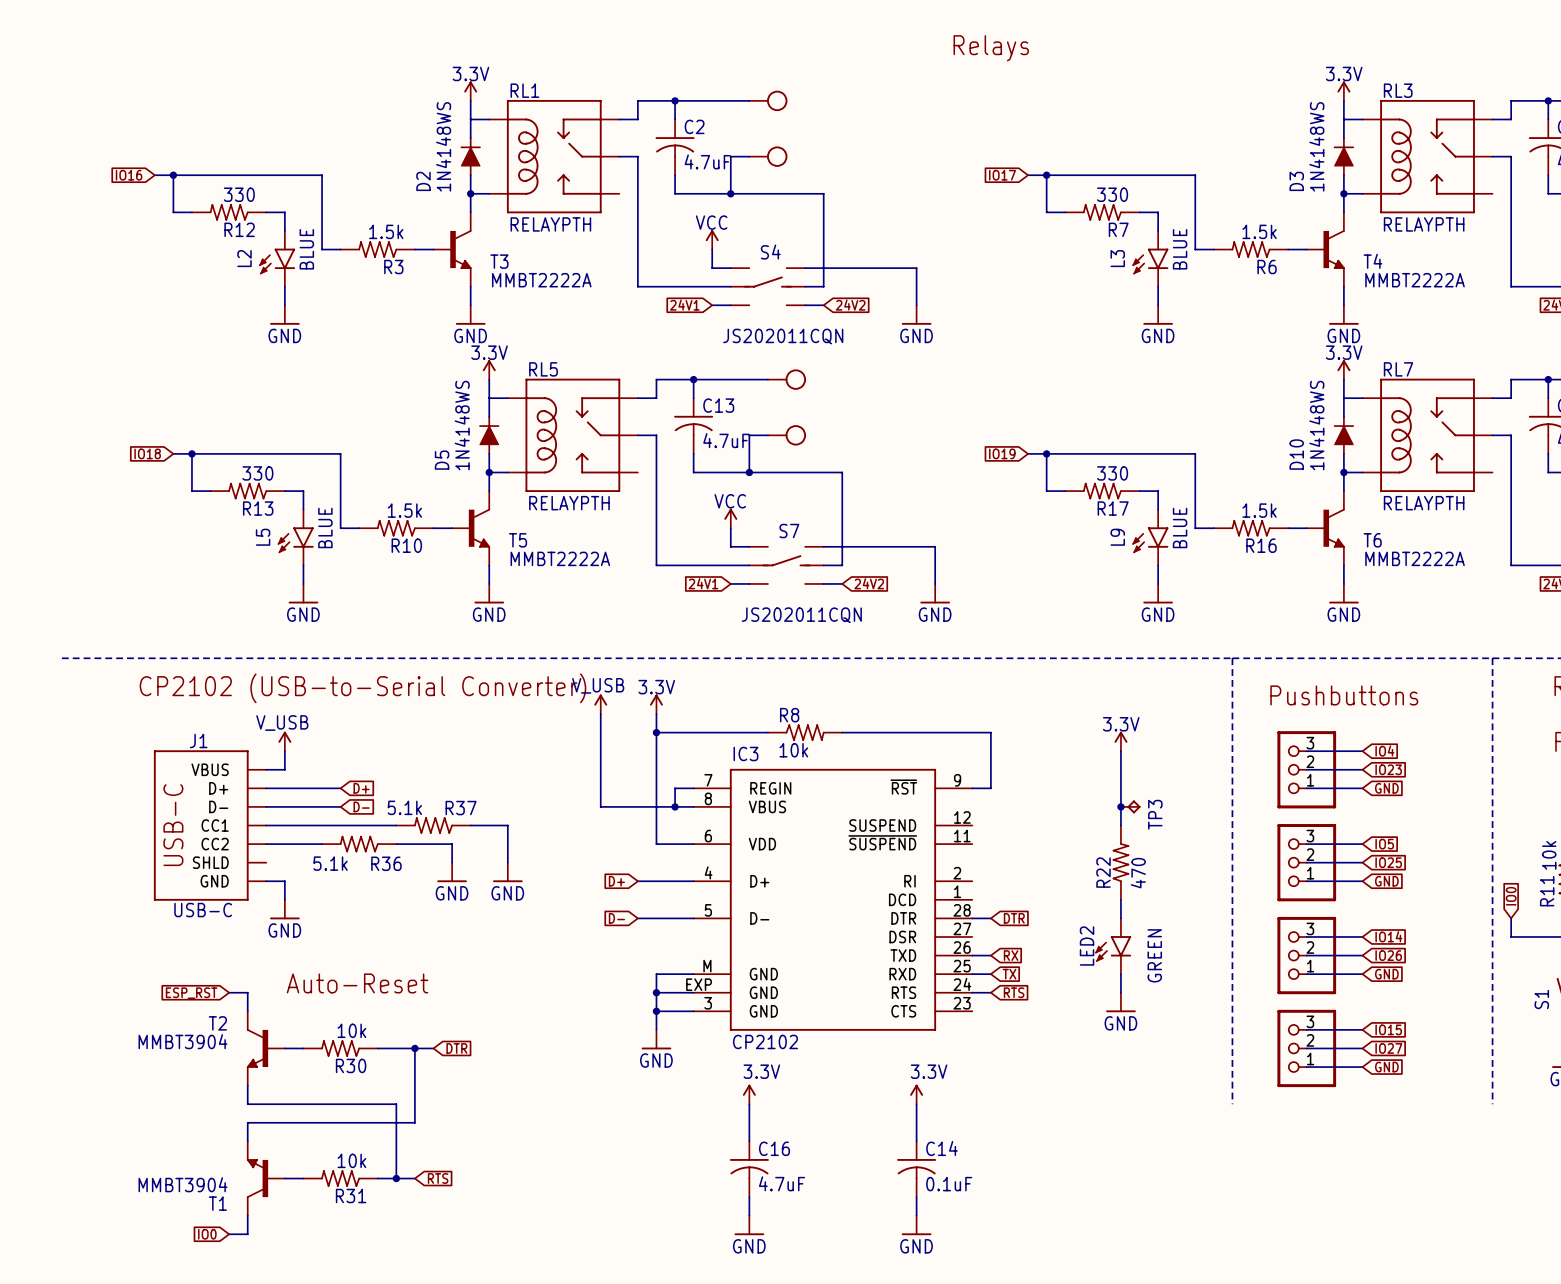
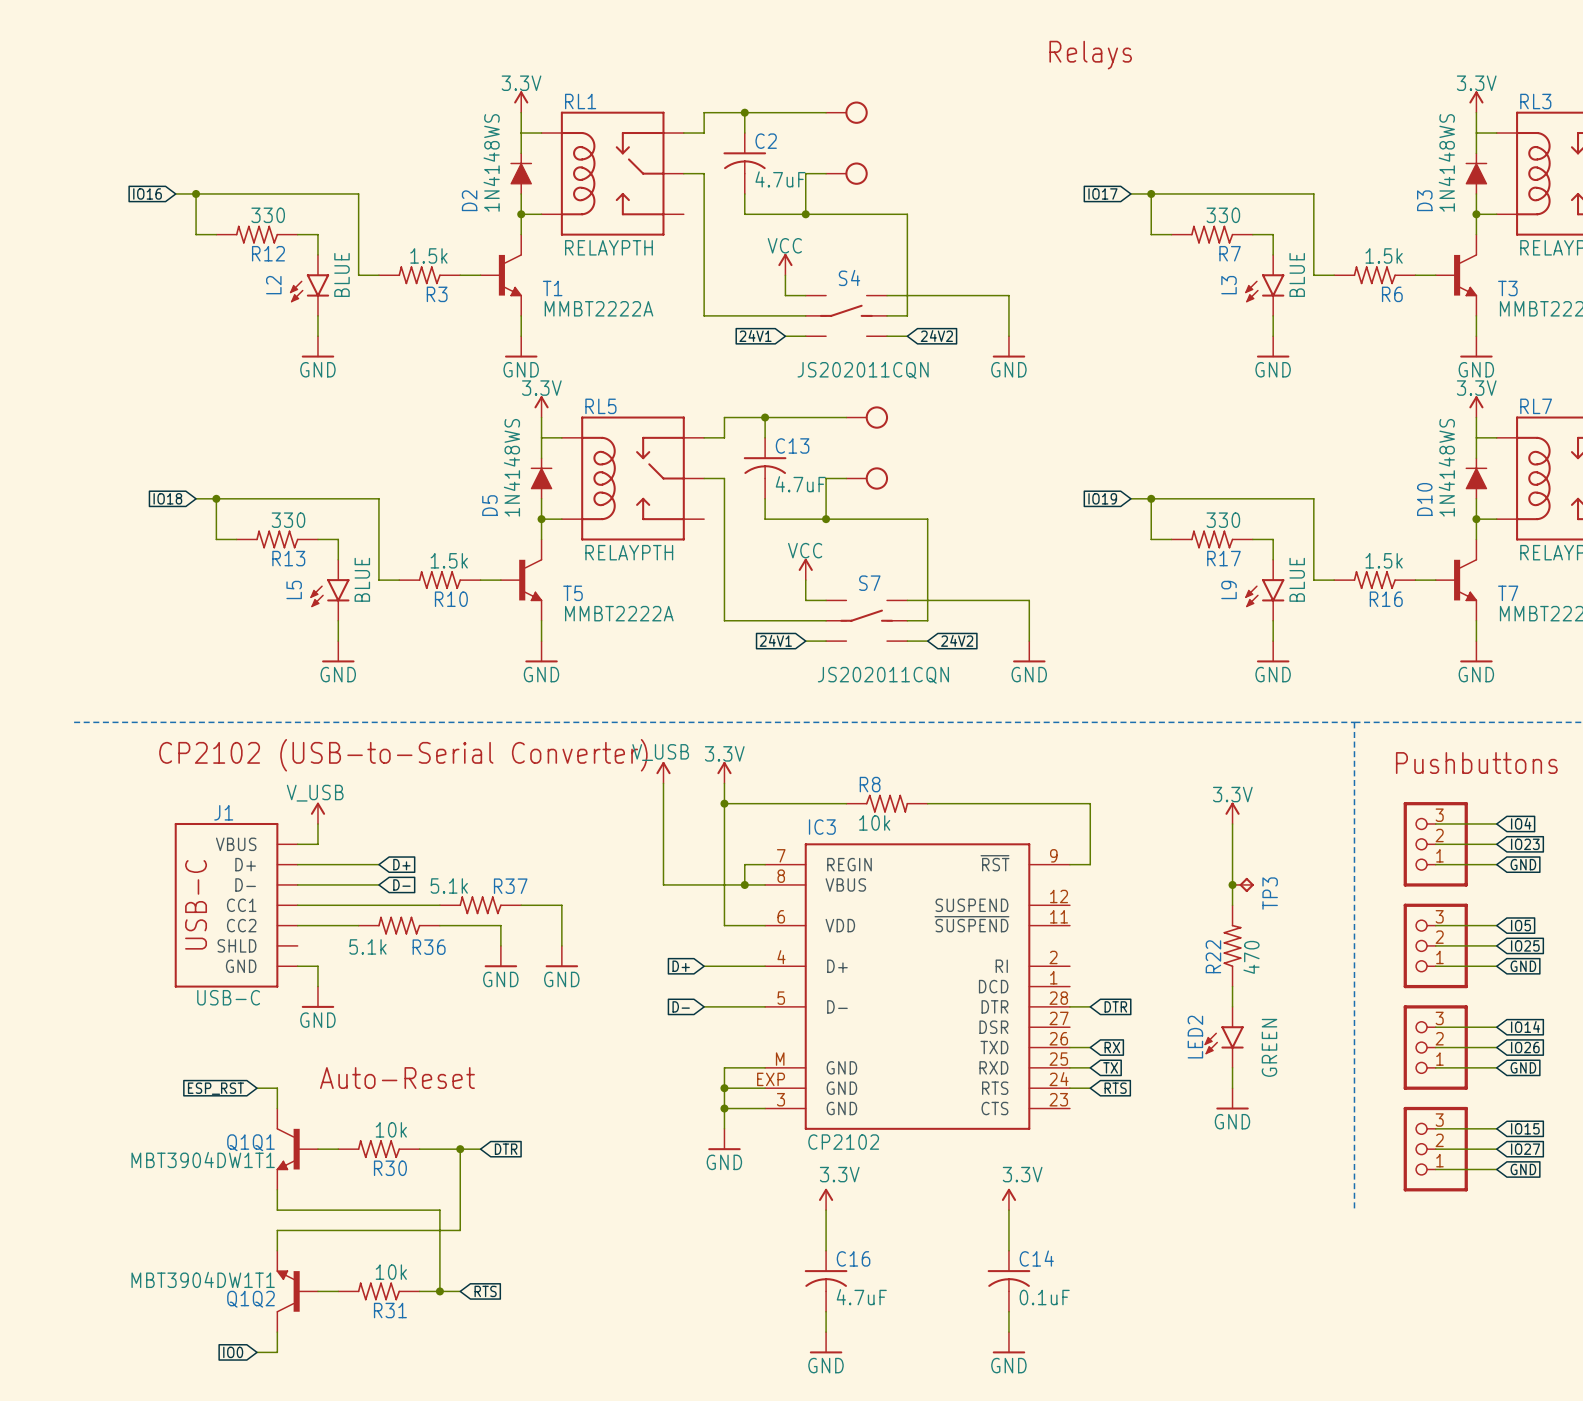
T3 name: T3 (499, 261) -> T1 (552, 288)
T4 name: T4 (1372, 261) -> T3 (1507, 288)
T6 name: T6 (1372, 540) -> T7 (1508, 593)
T2 name: T2 (217, 1023) -> Q1Q1 (250, 1142)
T2 value: MMBT3904 (183, 1041) -> MBT3904DW1T1 (203, 1160)
T1 value: MMBT3904 (183, 1184) -> MBT3904DW1T1 (203, 1279)
T1 name: T1 (217, 1203) -> Q1Q2 (250, 1299)

